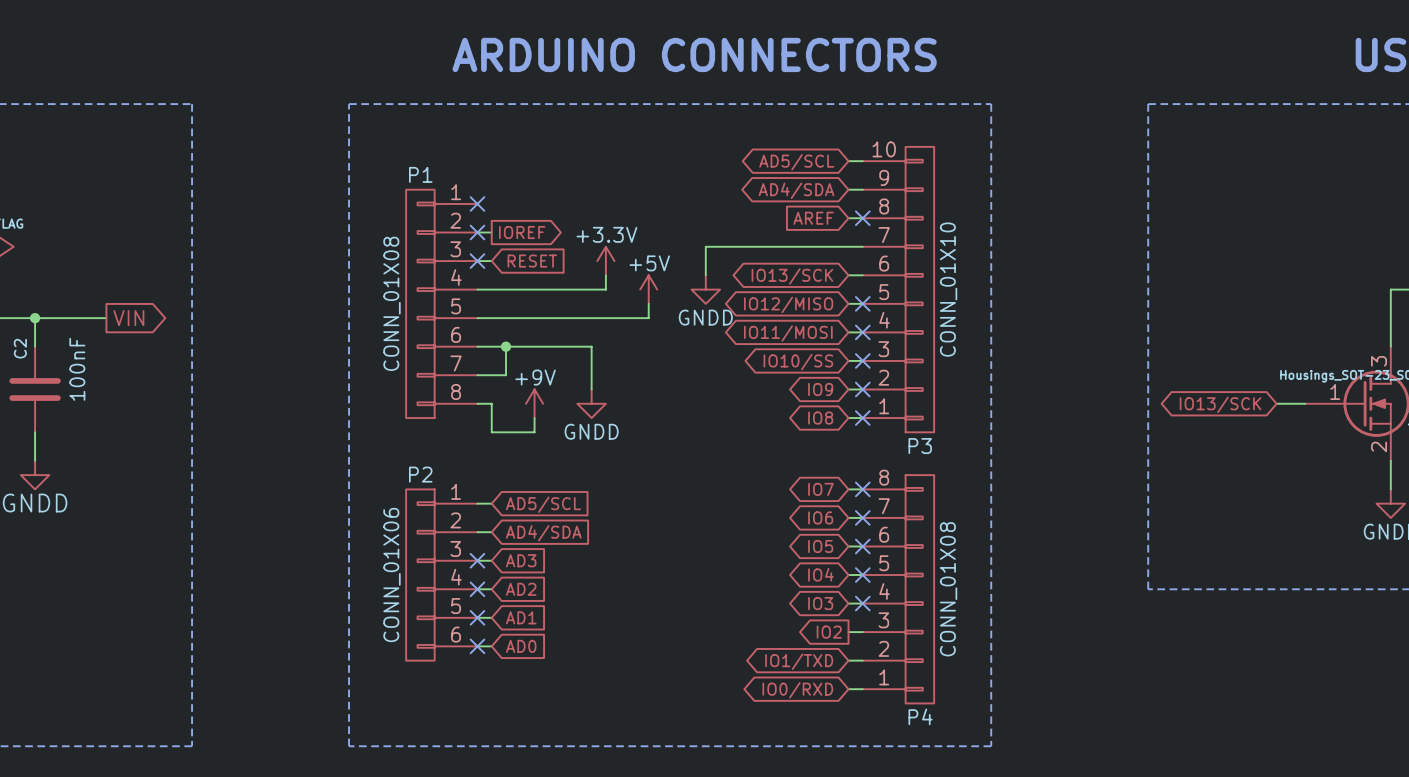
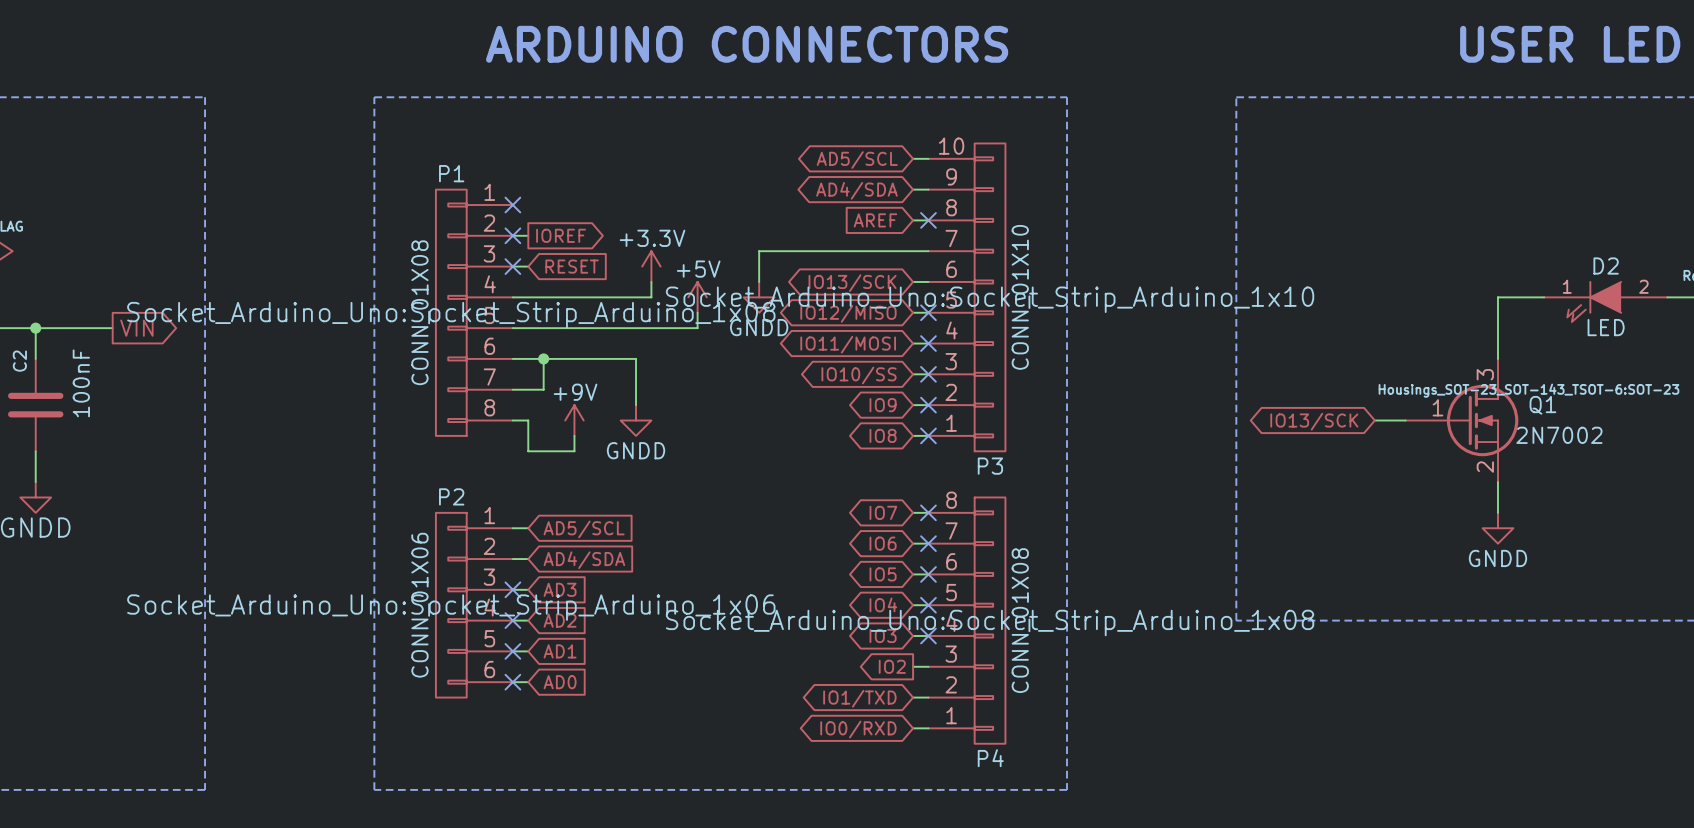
P3 text: none -> Socket_Arduino_Uno:Socket_Strip_Arduino_1x10 (990, 299)
P1 text: none -> Socket_Arduino_Uno:Socket_Strip_Arduino_1x08 (451, 315)
P2 text: none -> Socket_Arduino_Uno:Socket_Strip_Arduino_1x06 (451, 607)
P4 text: none -> Socket_Arduino_Uno:Socket_Strip_Arduino_1x08 (990, 622)

